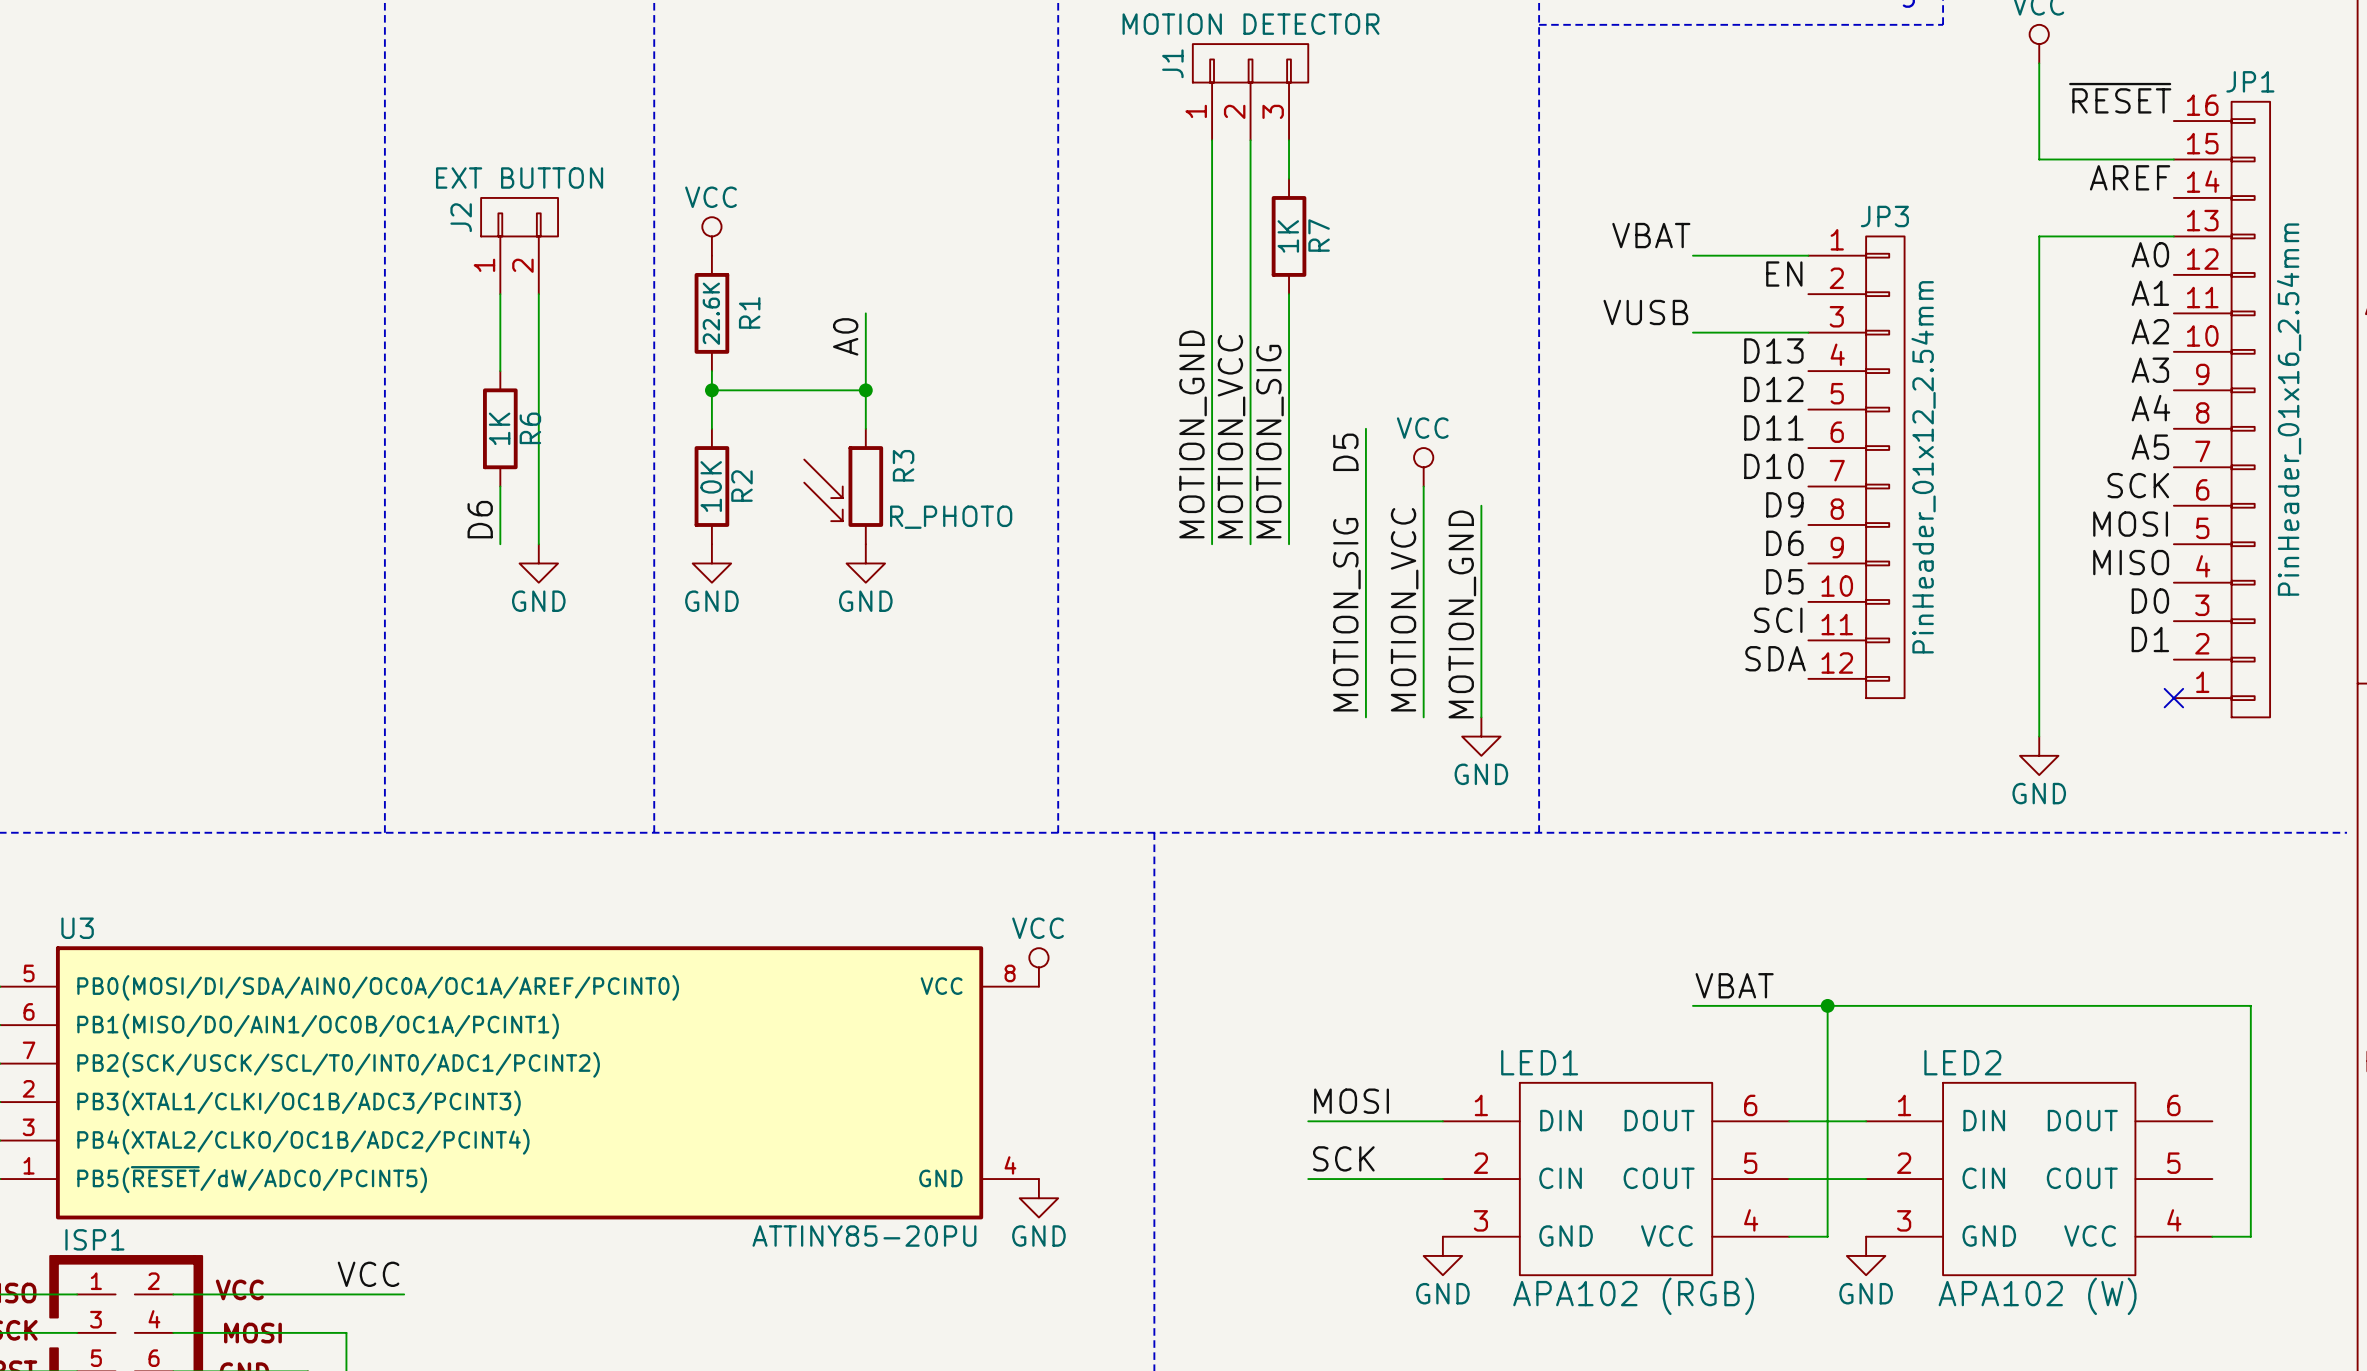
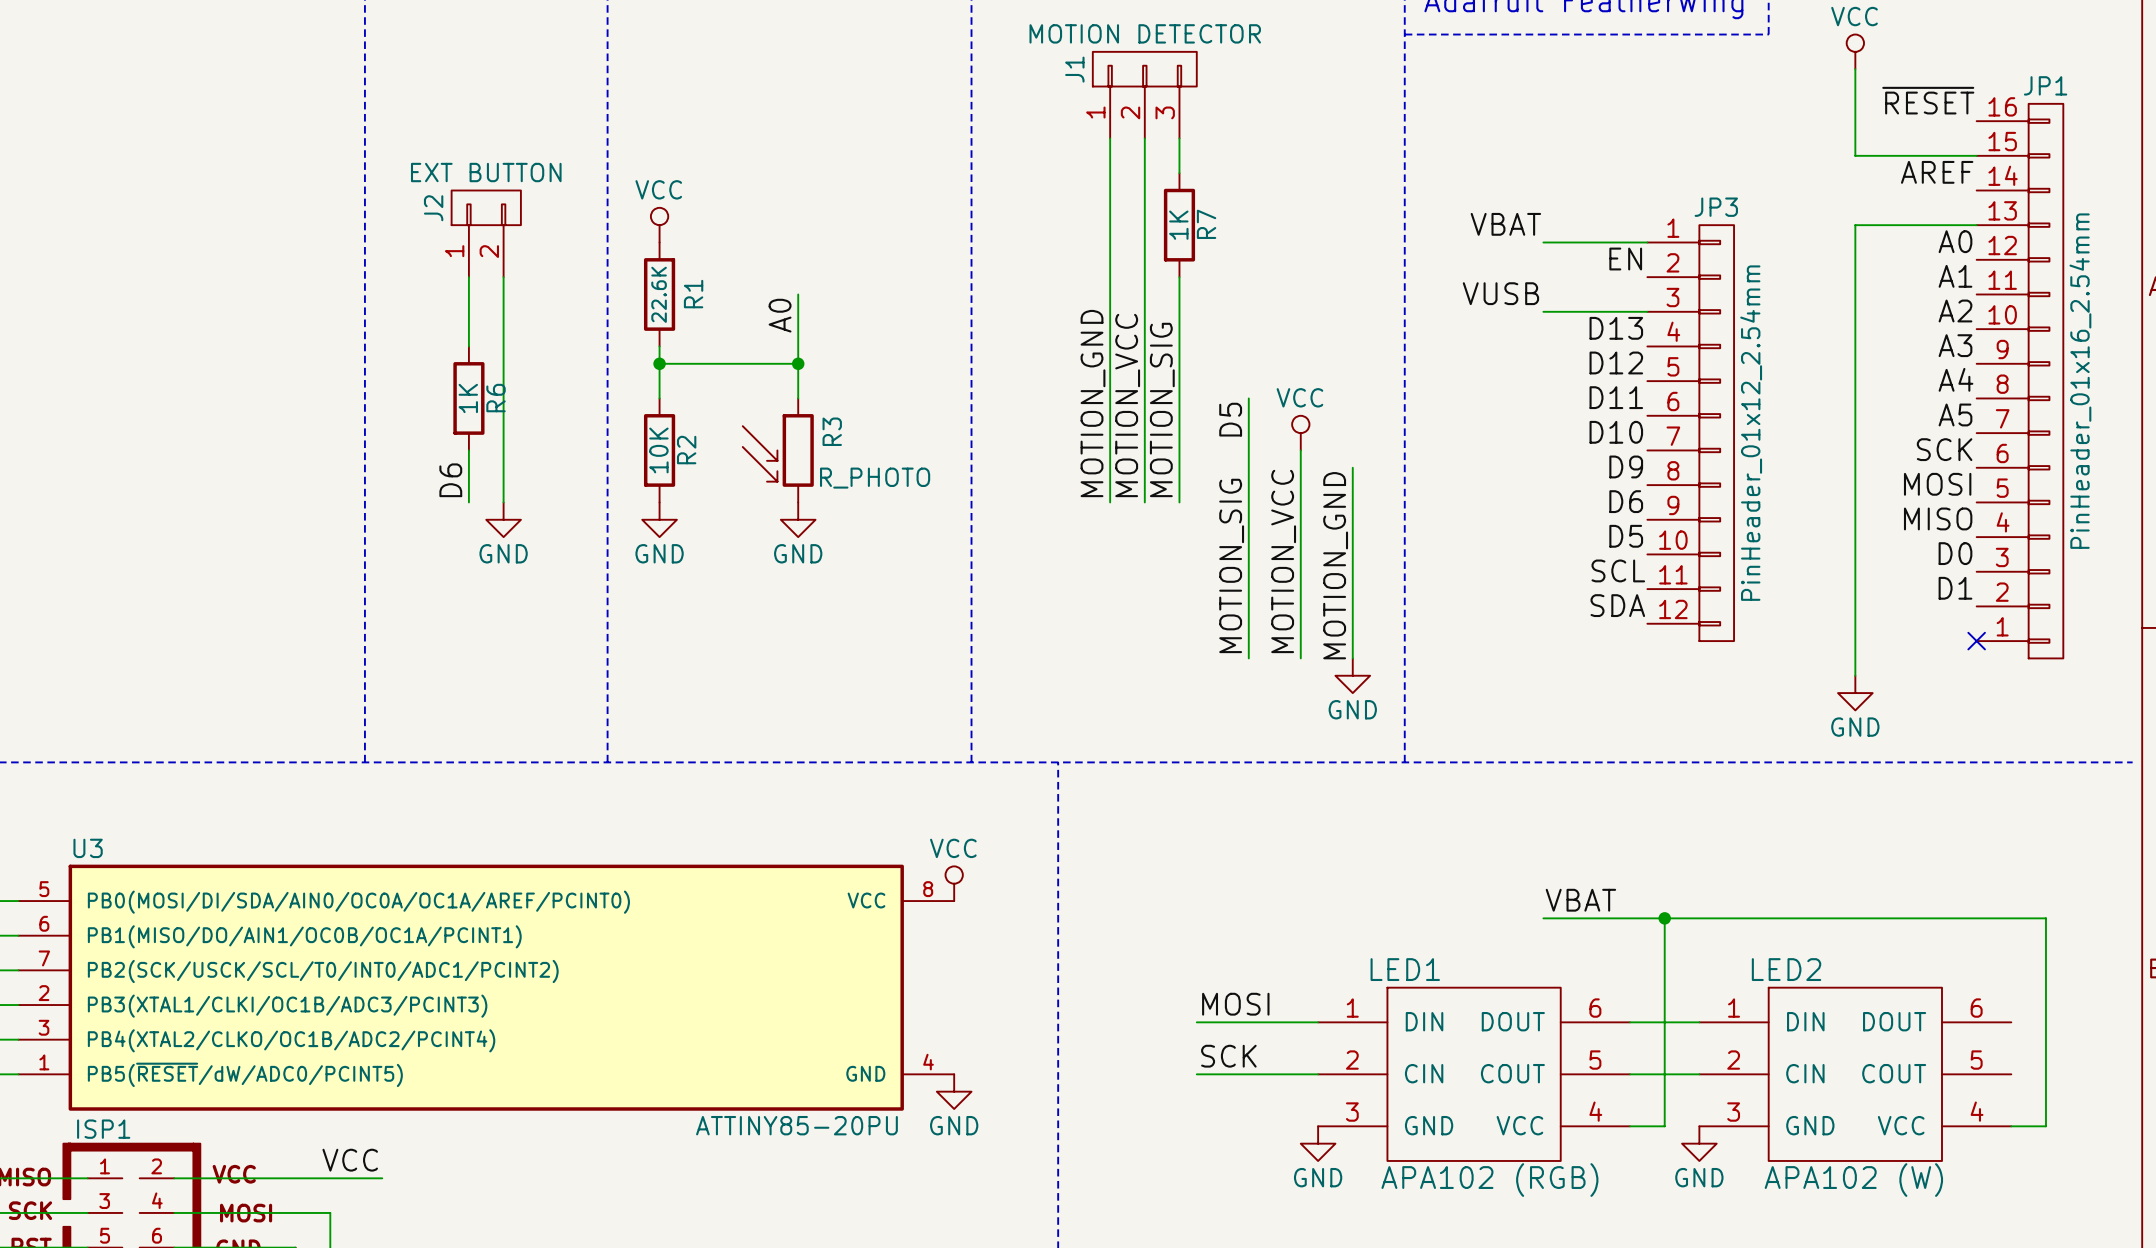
label: SCI (1778, 620) -> SCL (1618, 570)

